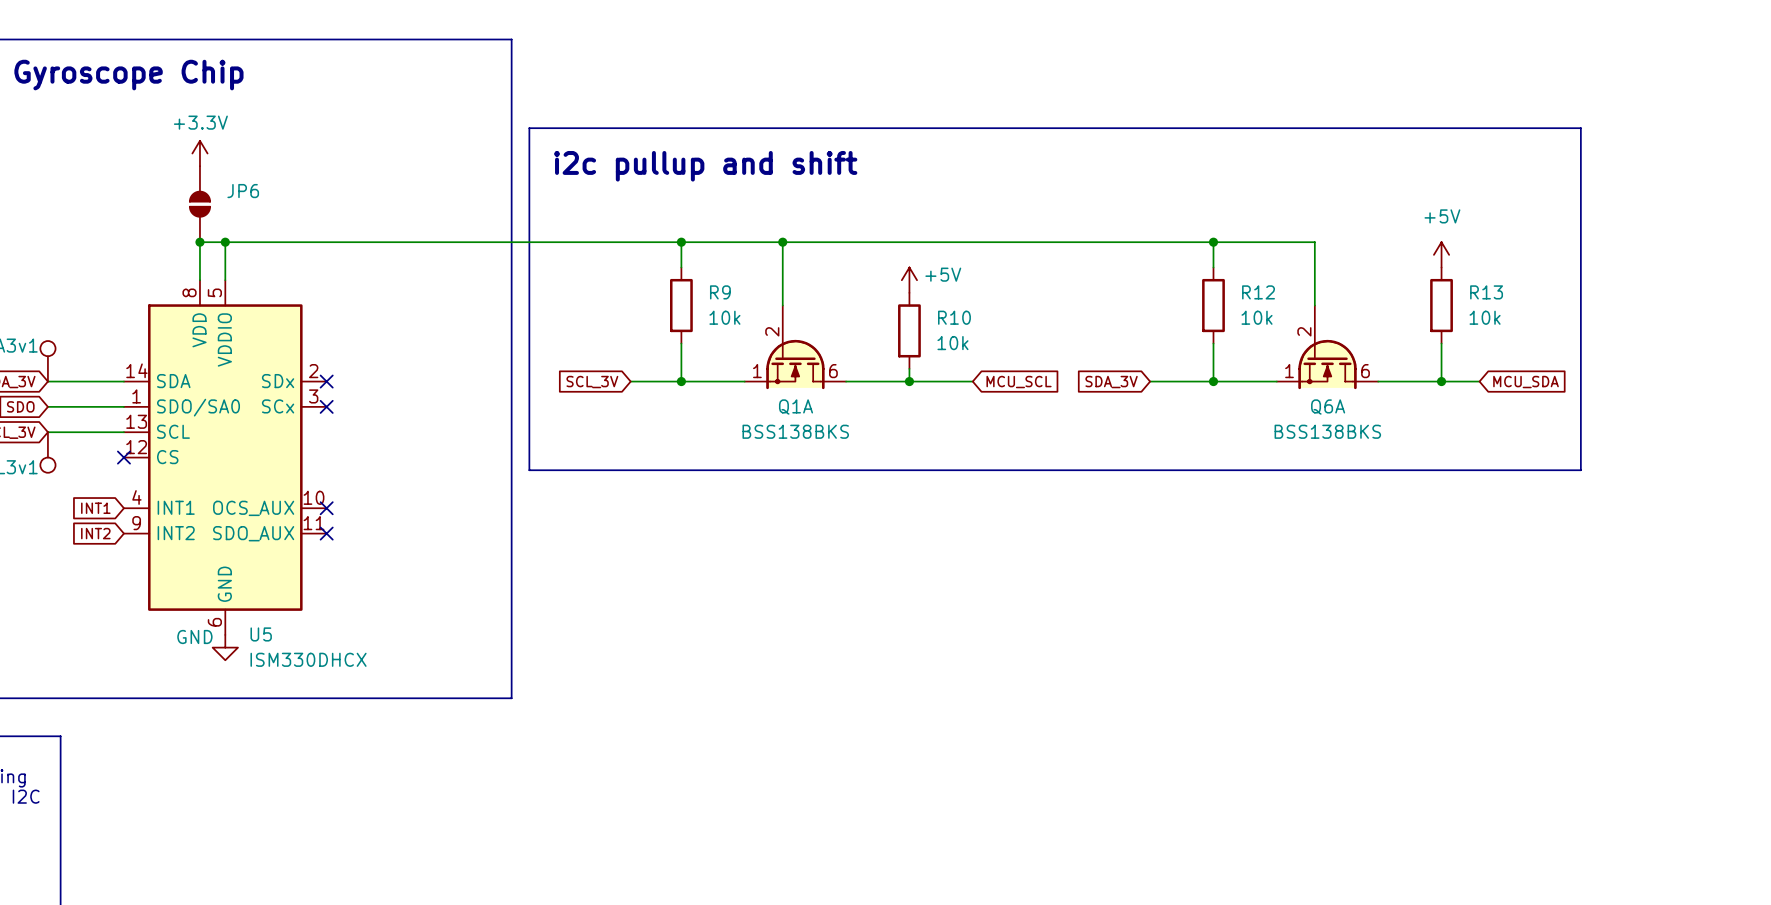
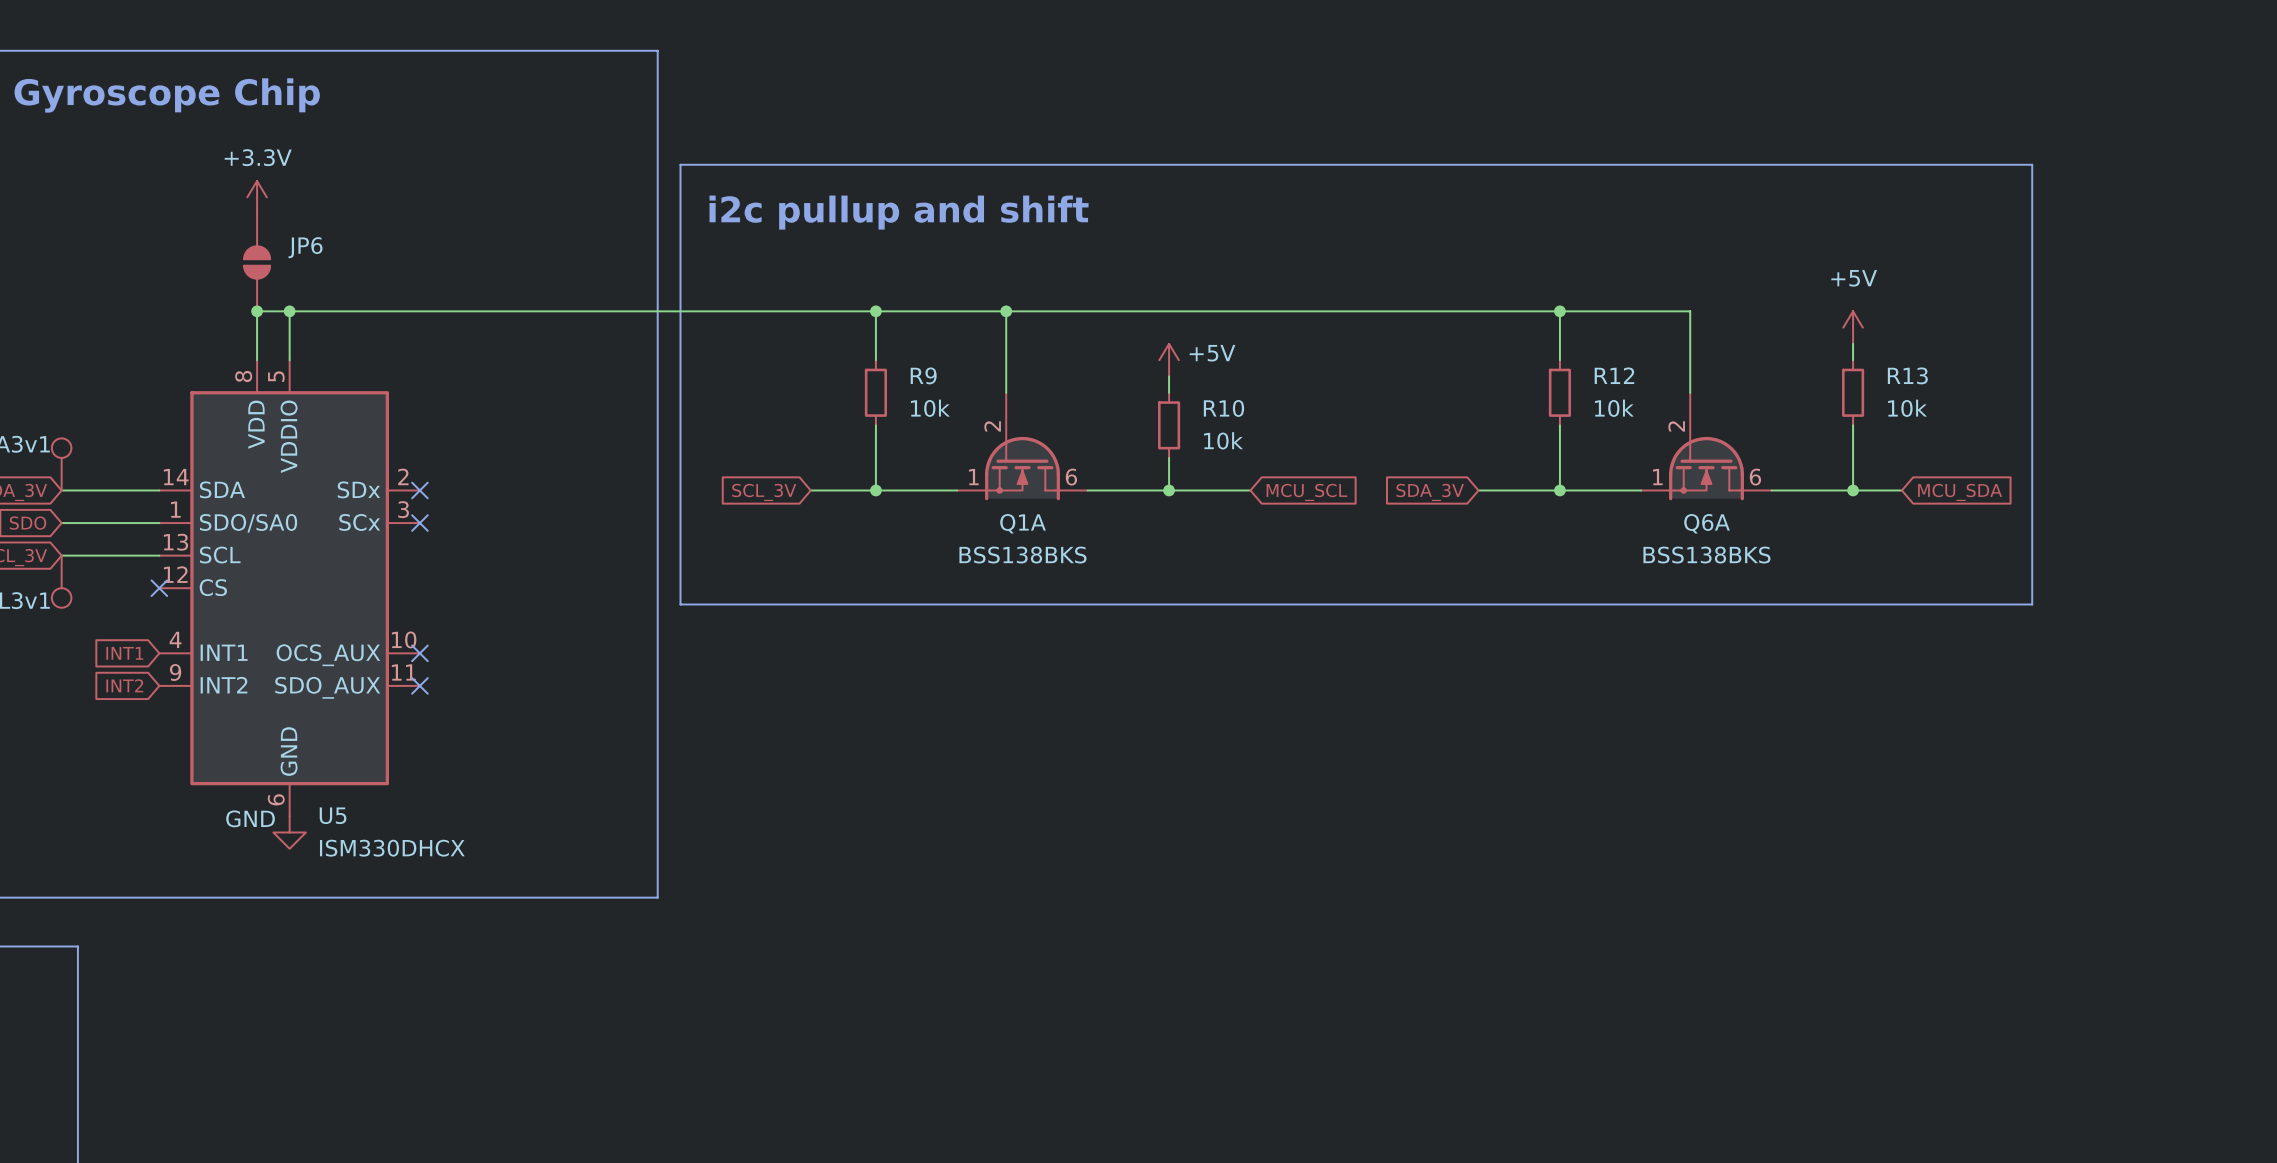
R9 symbol: [669, 267, 693, 344] -> [864, 360, 888, 426]
R12 symbol: [1202, 267, 1225, 344] -> [1548, 360, 1572, 426]
R13 symbol: [1430, 267, 1453, 344] -> [1842, 360, 1865, 426]
R10 symbol: [898, 292, 921, 369] -> [1158, 392, 1181, 458]

